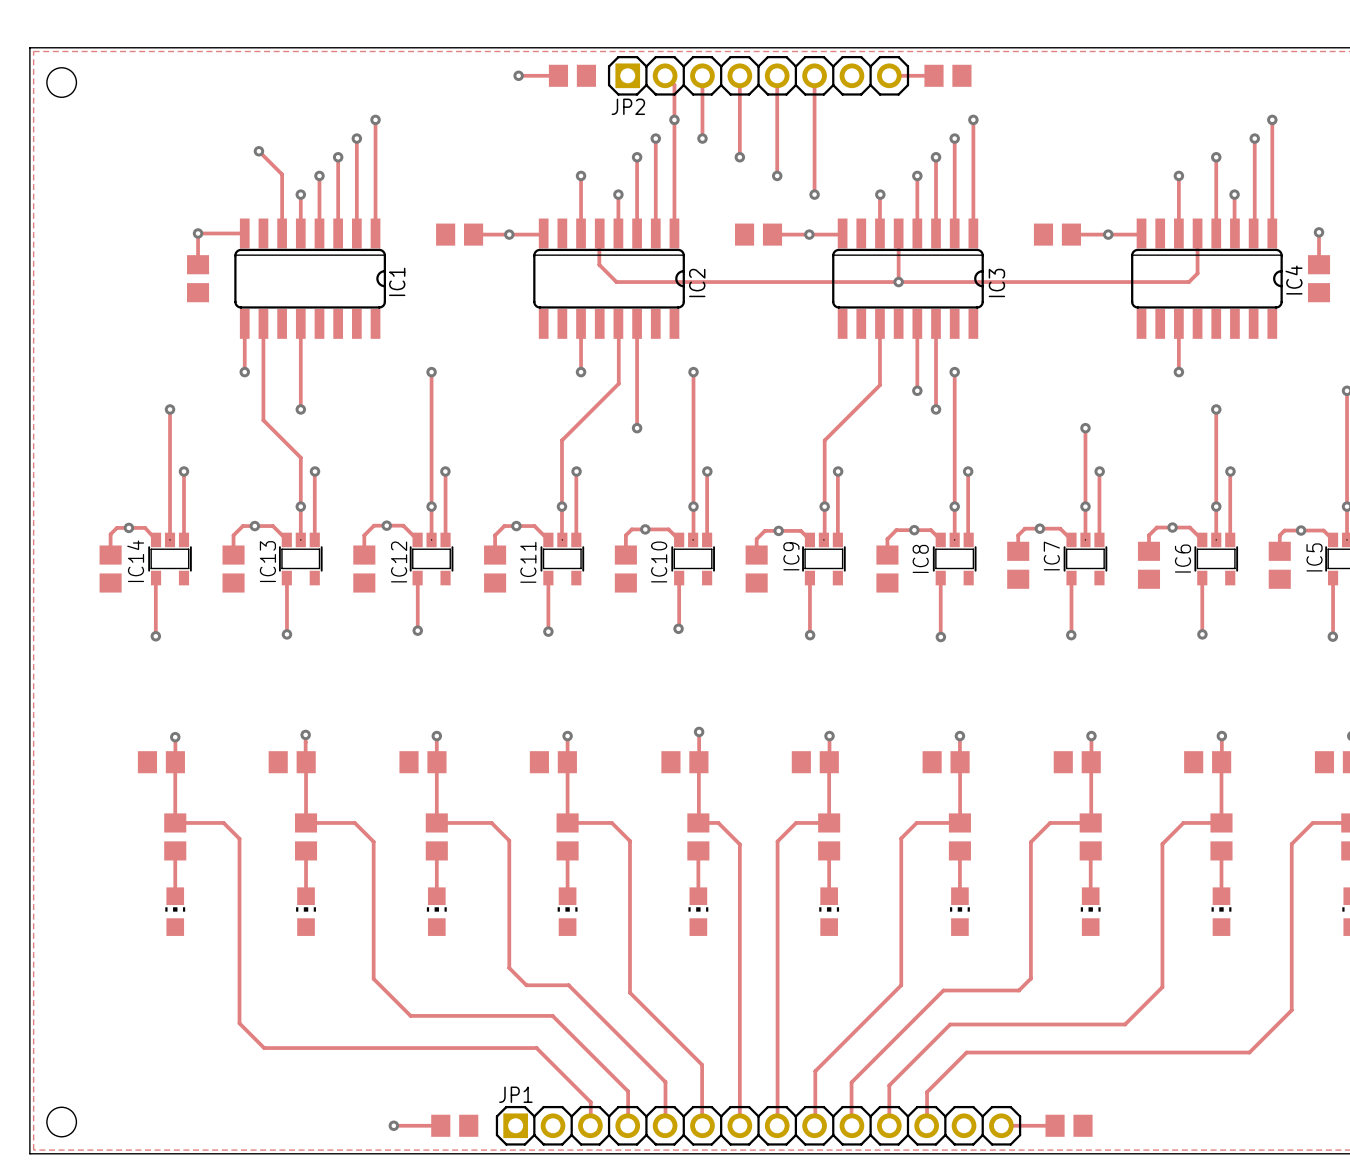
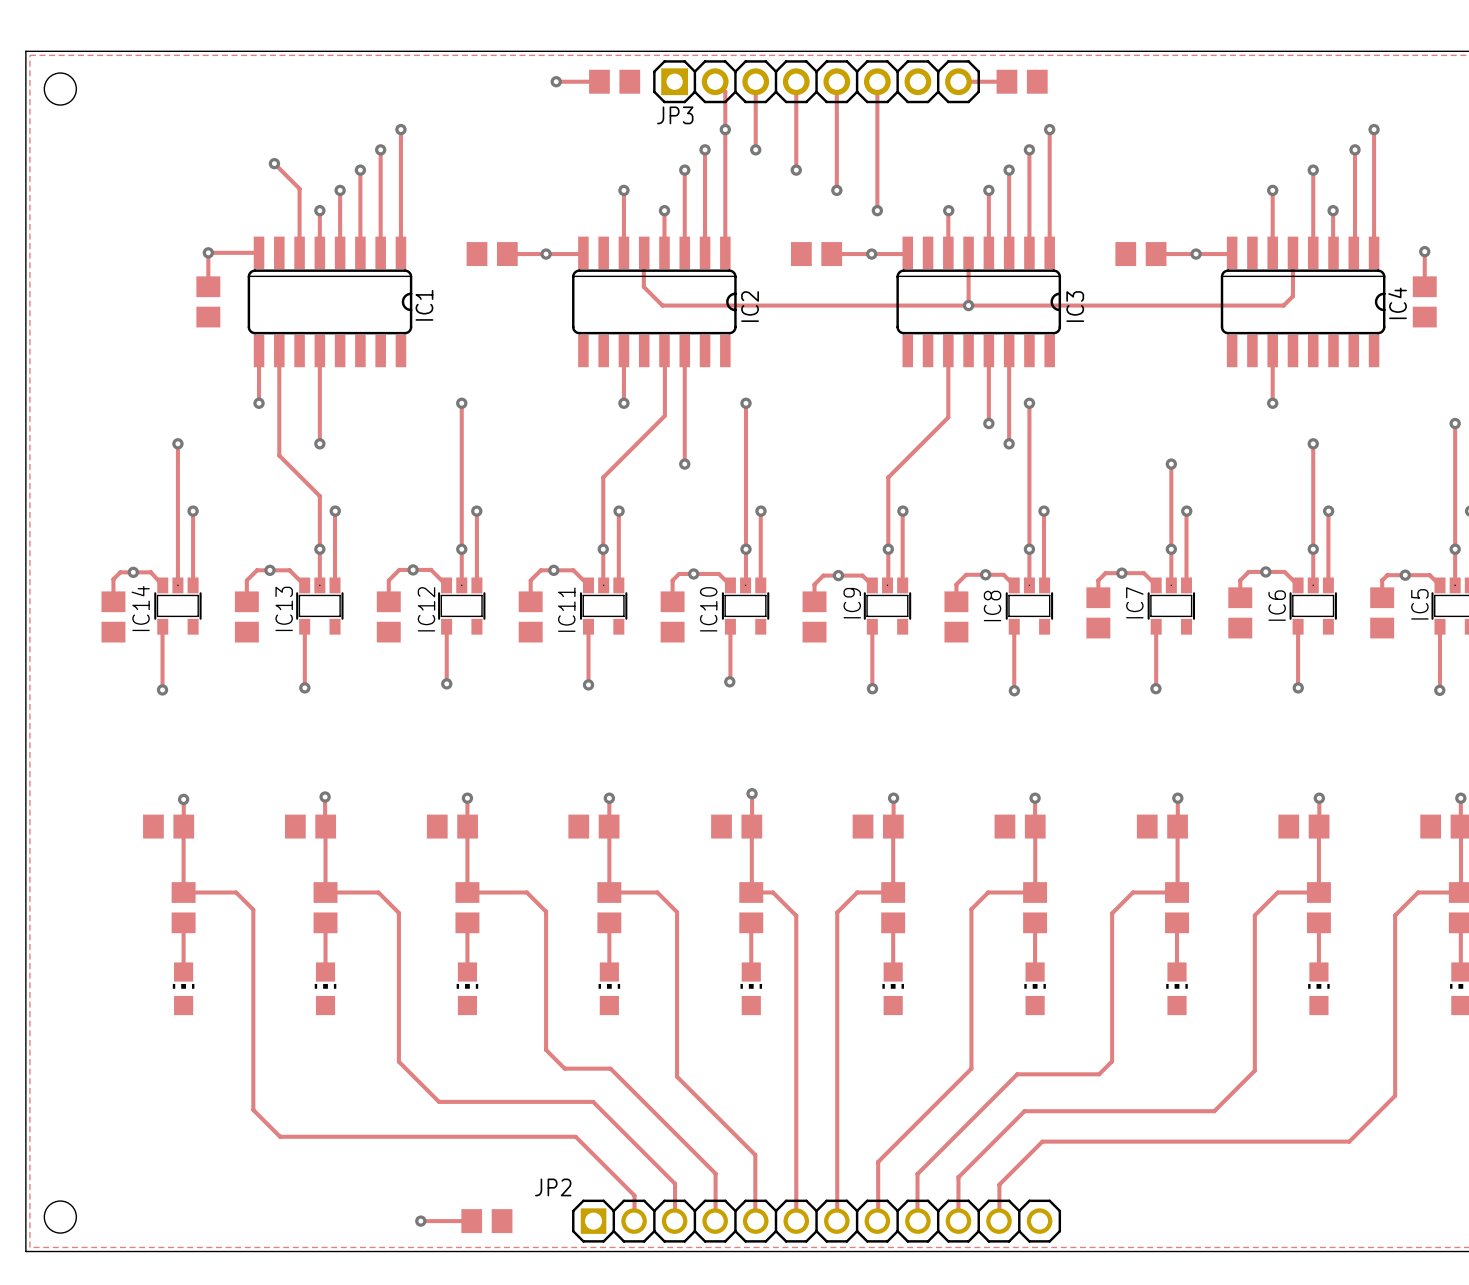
JP2 name: JP2 (628, 106) -> JP3 (675, 115)
JP1: (758, 1125) -> none
JP2: none -> (816, 1221)
track: (1001, 1125) (1055, 1125) -> none
part: (1069, 1125) -> none

